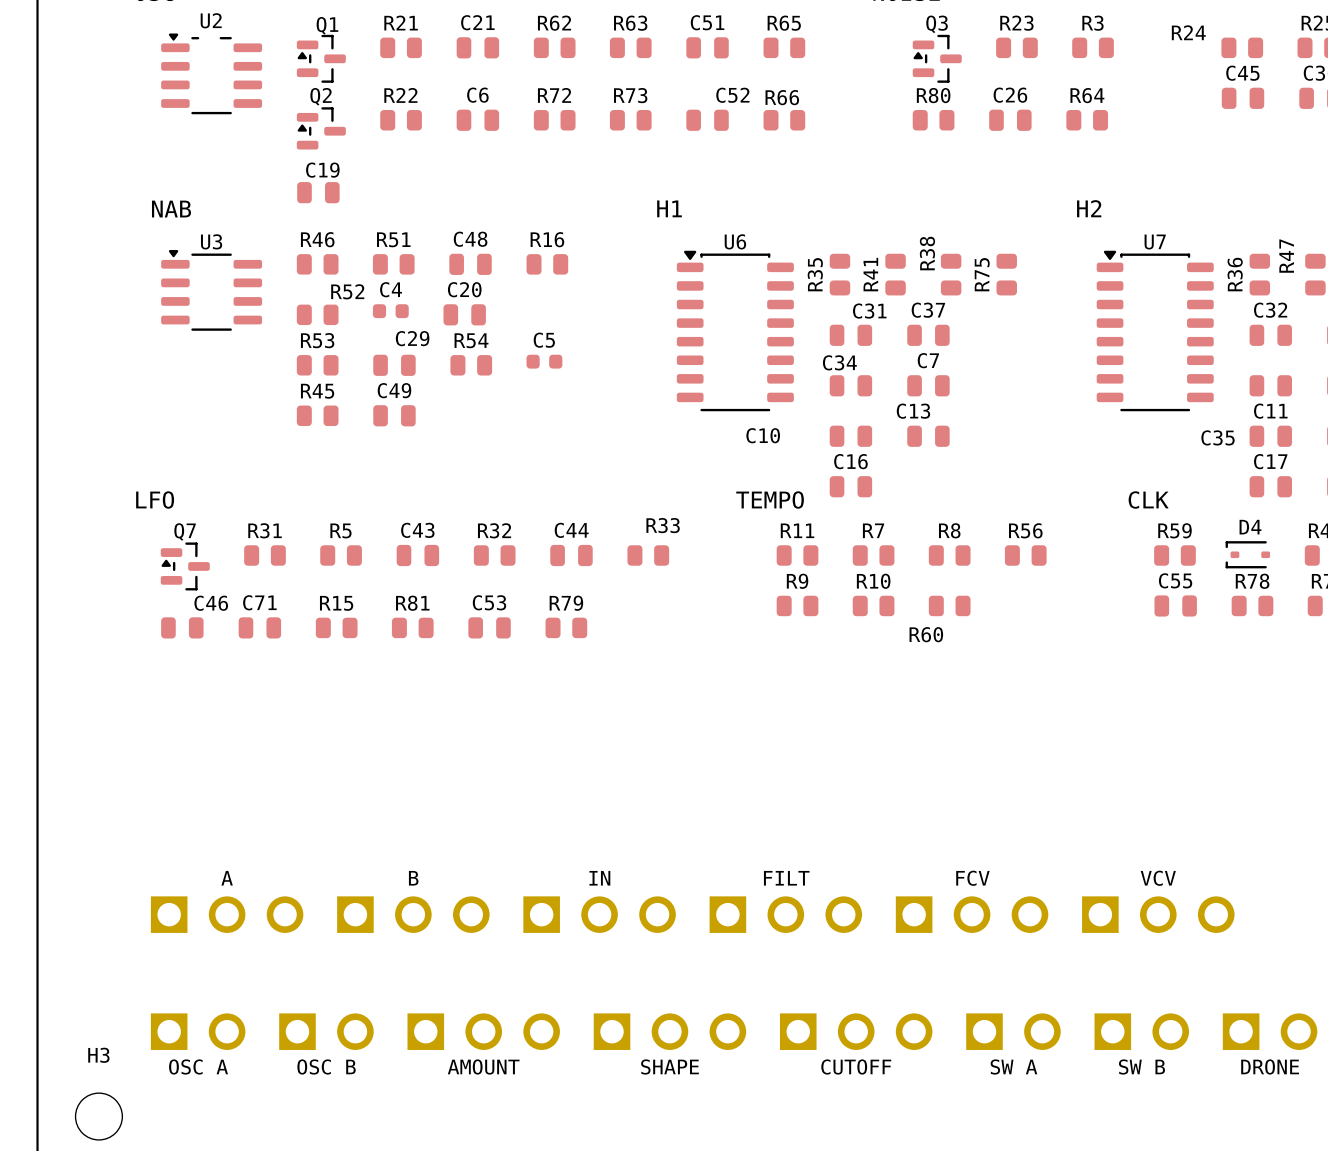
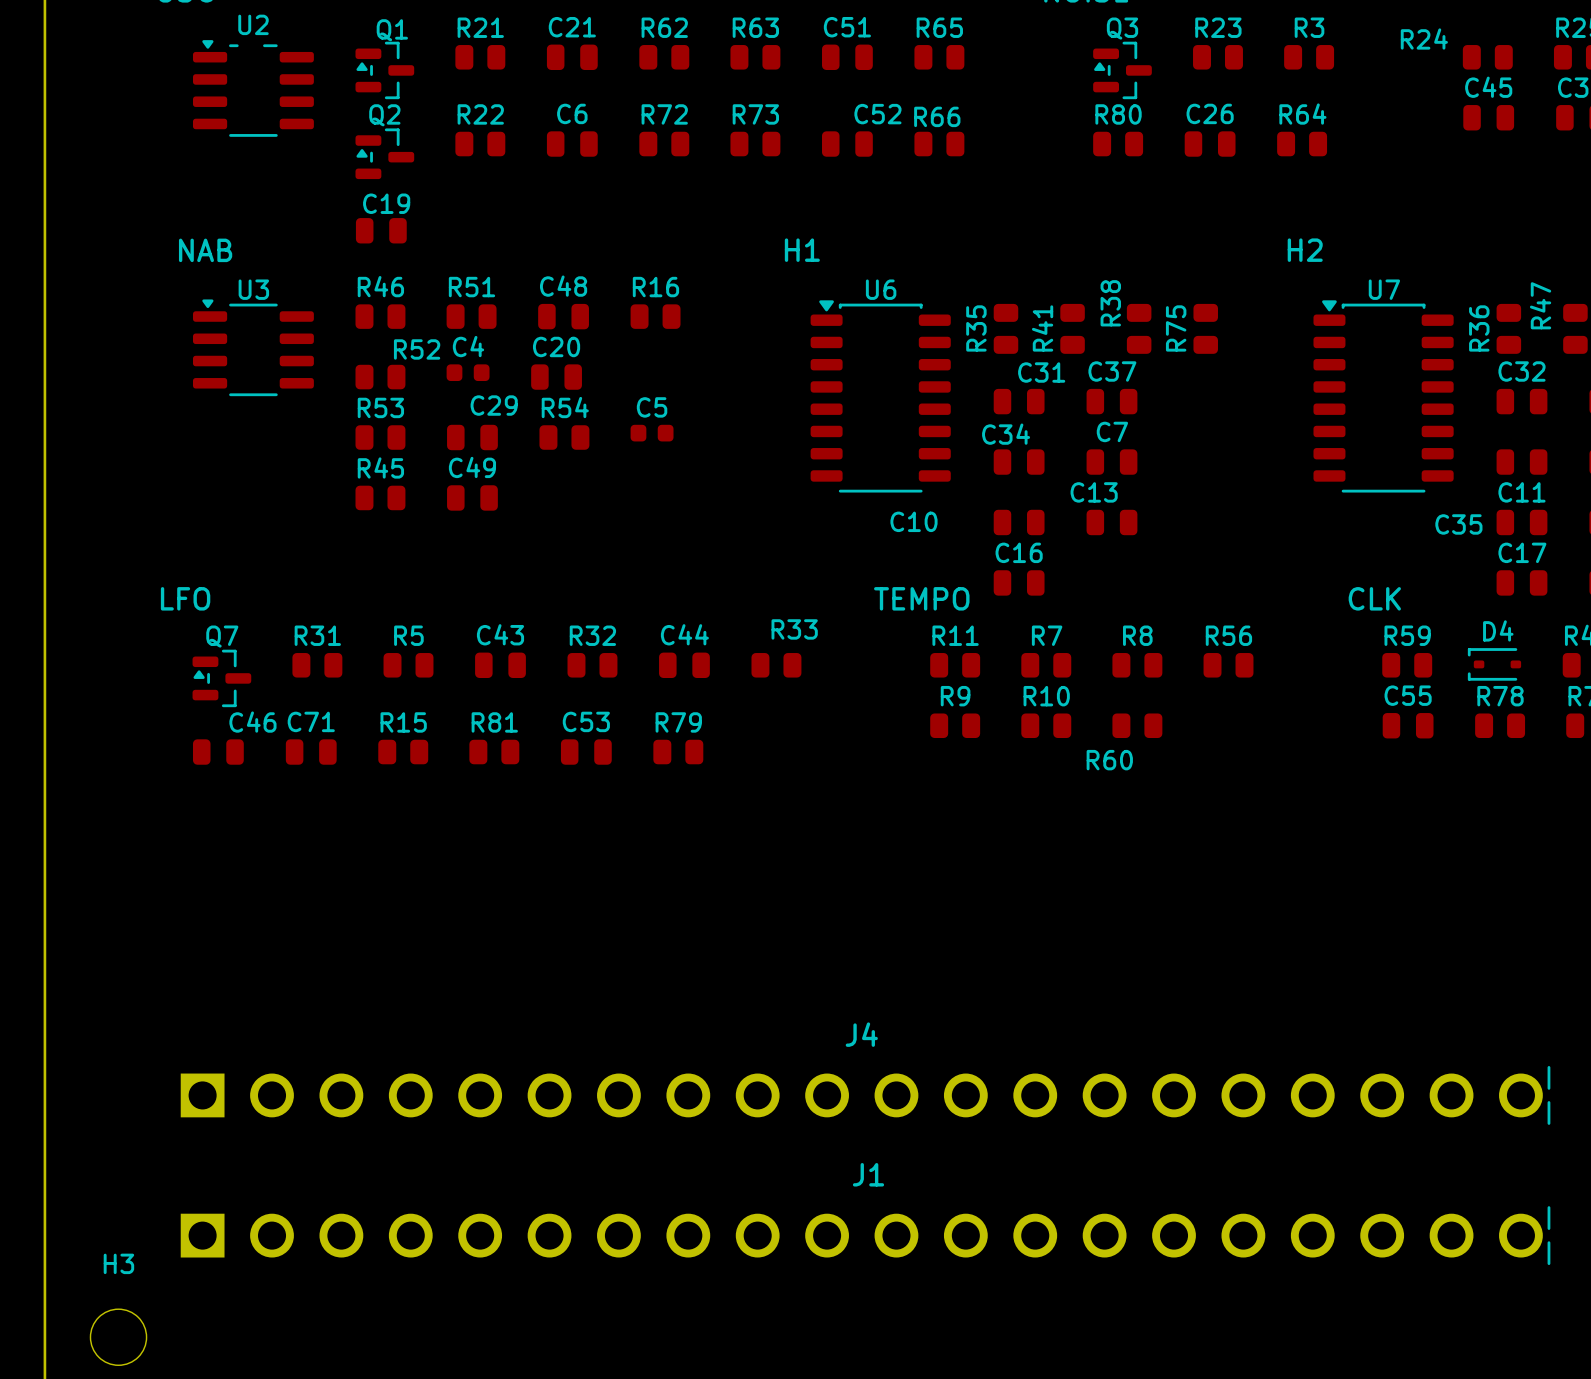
text: none -> J4 (861, 1034)
part: A (227, 914) -> none
part: B (413, 914) -> none
part: IN (599, 914) -> none
part: none -> (865, 1095)
part: FILT (785, 914) -> none
part: FCV (972, 914) -> none
part: VCV (1158, 914) -> none
text: none -> J1 (868, 1174)
part: OSC A (198, 1031) -> none
part: OSC B (326, 1031) -> none
part: AMOUNT (483, 1031) -> none
part: SHAPE (669, 1031) -> none
part: none -> (865, 1235)
part: CUTOFF (856, 1031) -> none
part: SW A (1013, 1031) -> none
part: SW B (1141, 1031) -> none
part: DRONE (1270, 1031) -> none

